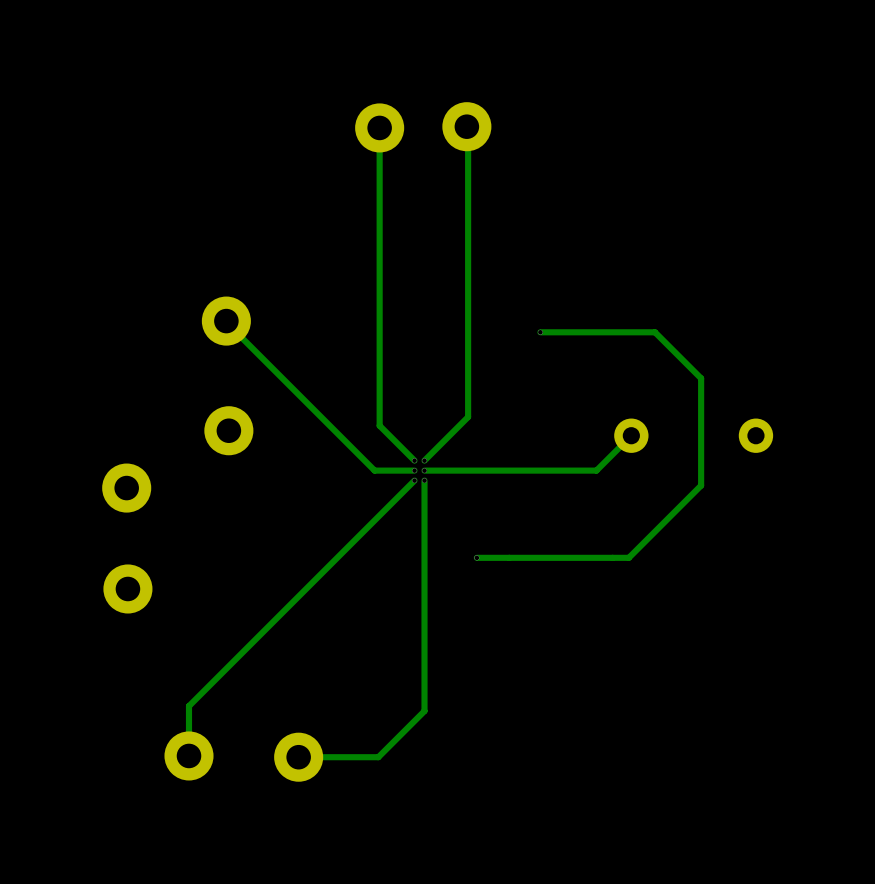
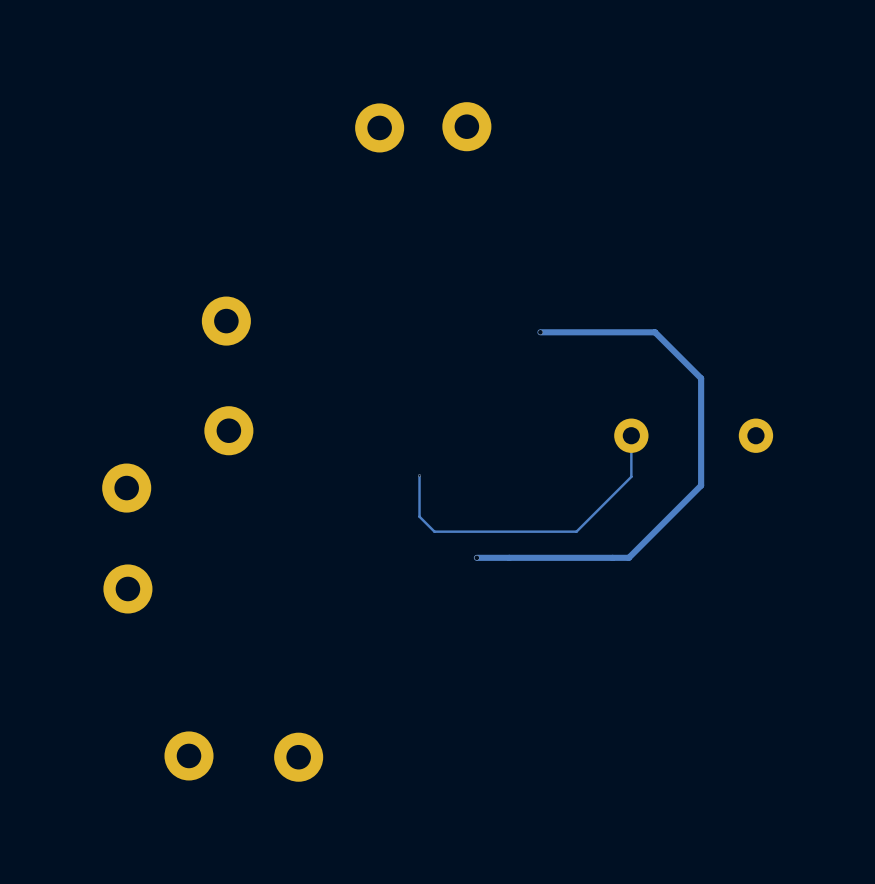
track: (466, 126) (468, 417) (424, 460) -> none
track: (379, 127) (379, 425) (414, 460) -> none
track: (226, 321) (374, 470) (414, 470) -> none
track: (631, 435) (596, 470) (424, 470) -> (631, 435) (631, 476) (576, 531) (434, 531) (419, 516) (419, 475)
via: (414, 460) -> none
via: (424, 460) -> none
via: (414, 470) -> none
via: (424, 470) -> none
via: none -> (419, 475)
track: (414, 480) (189, 706) (189, 755) -> none
via: (414, 480) -> none
track: (424, 480) (424, 711) (378, 757) (298, 757) -> none
via: (424, 480) -> none

